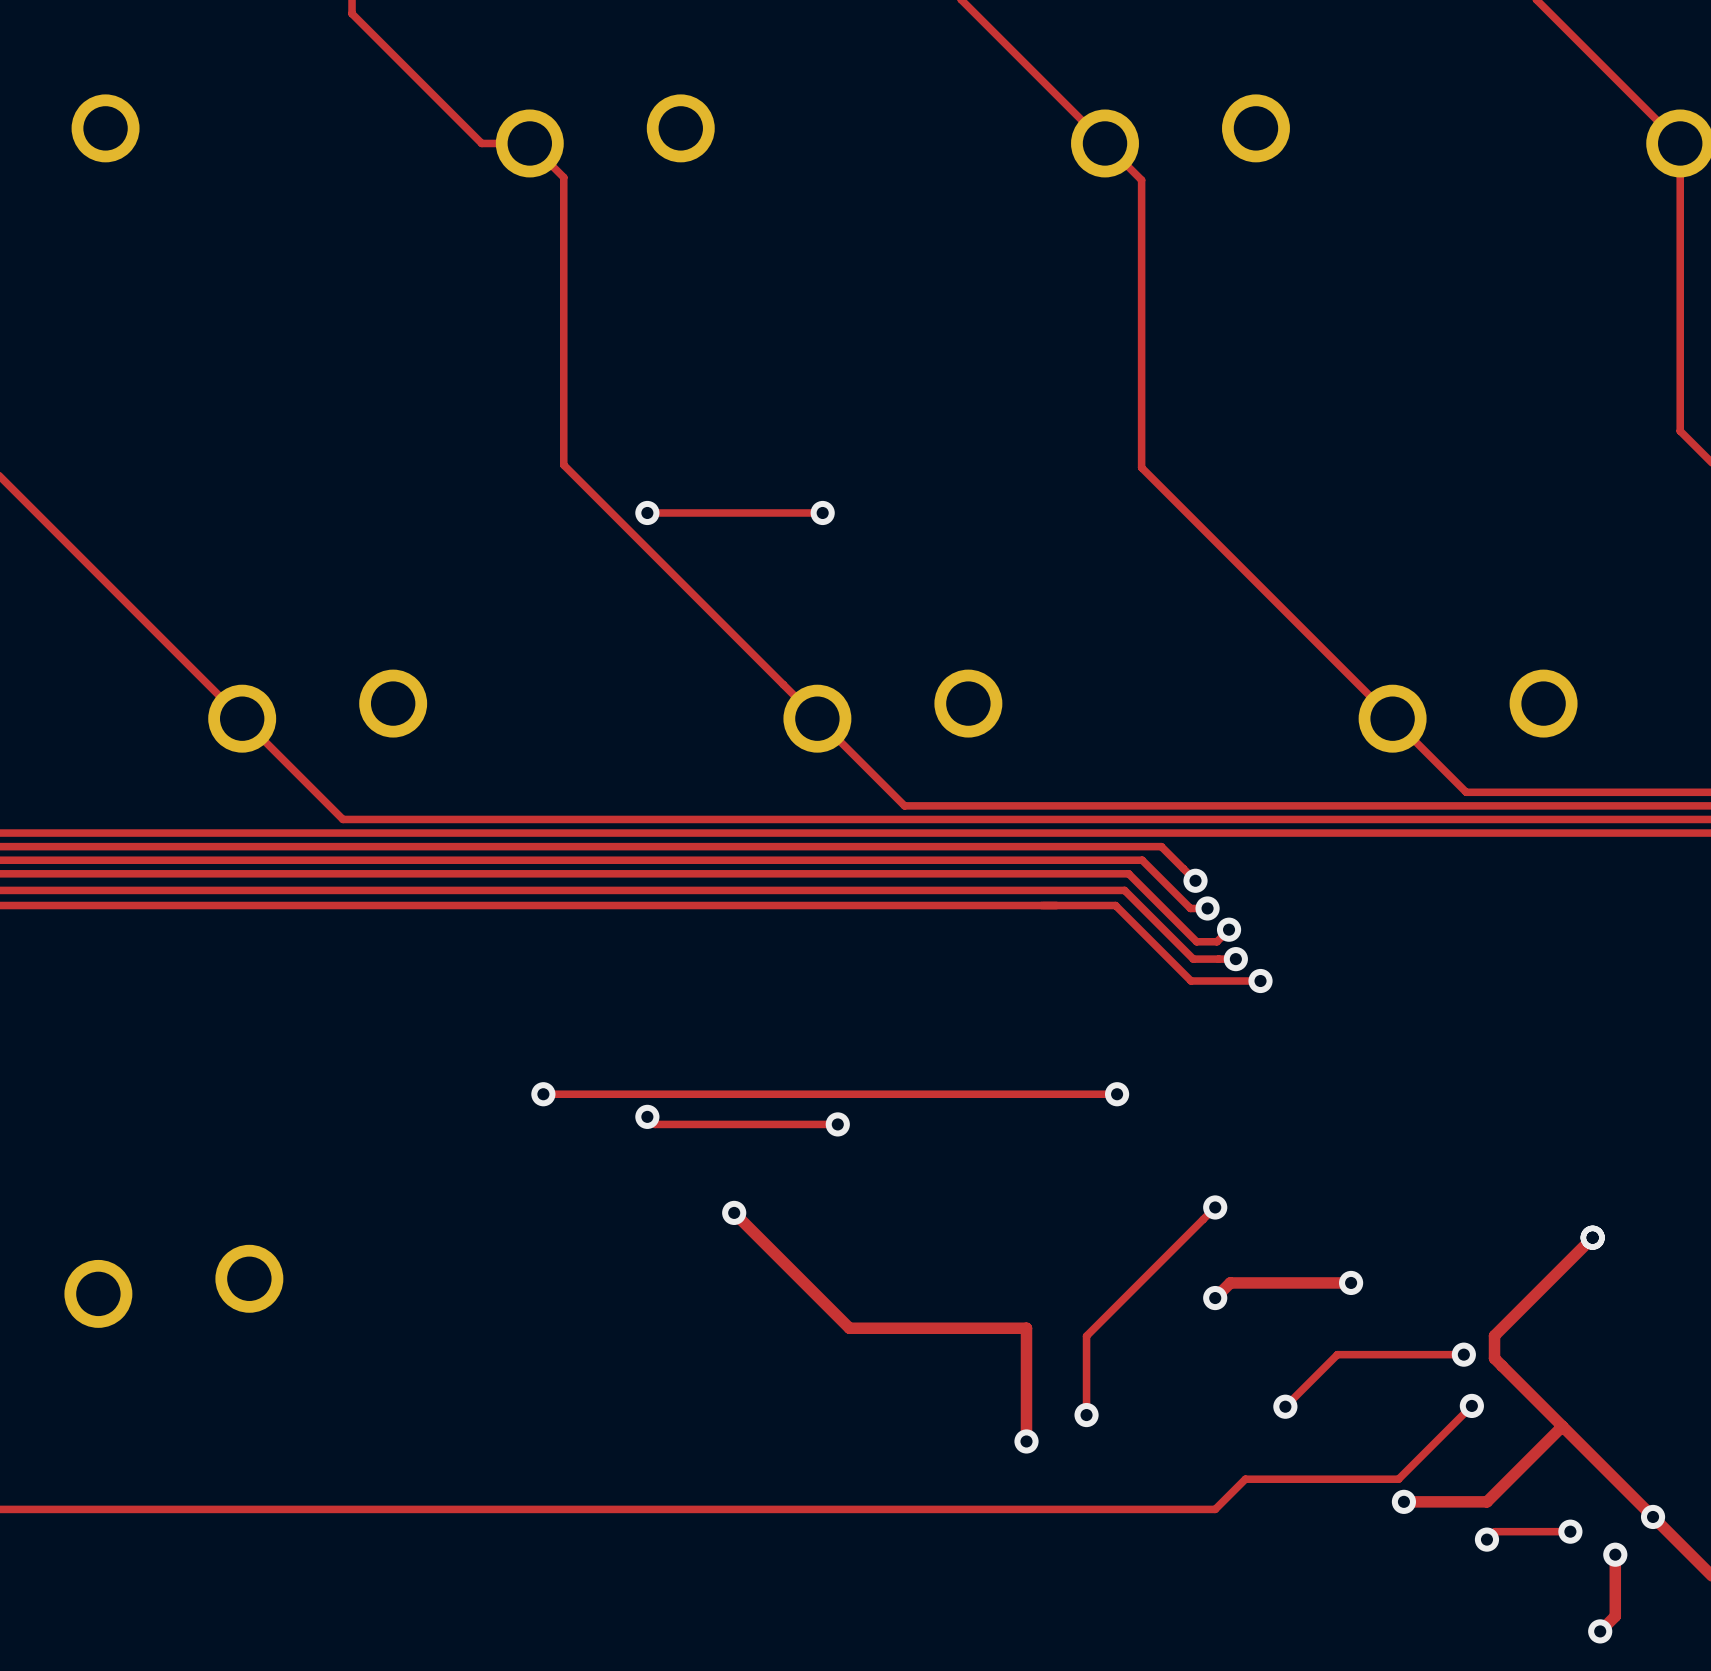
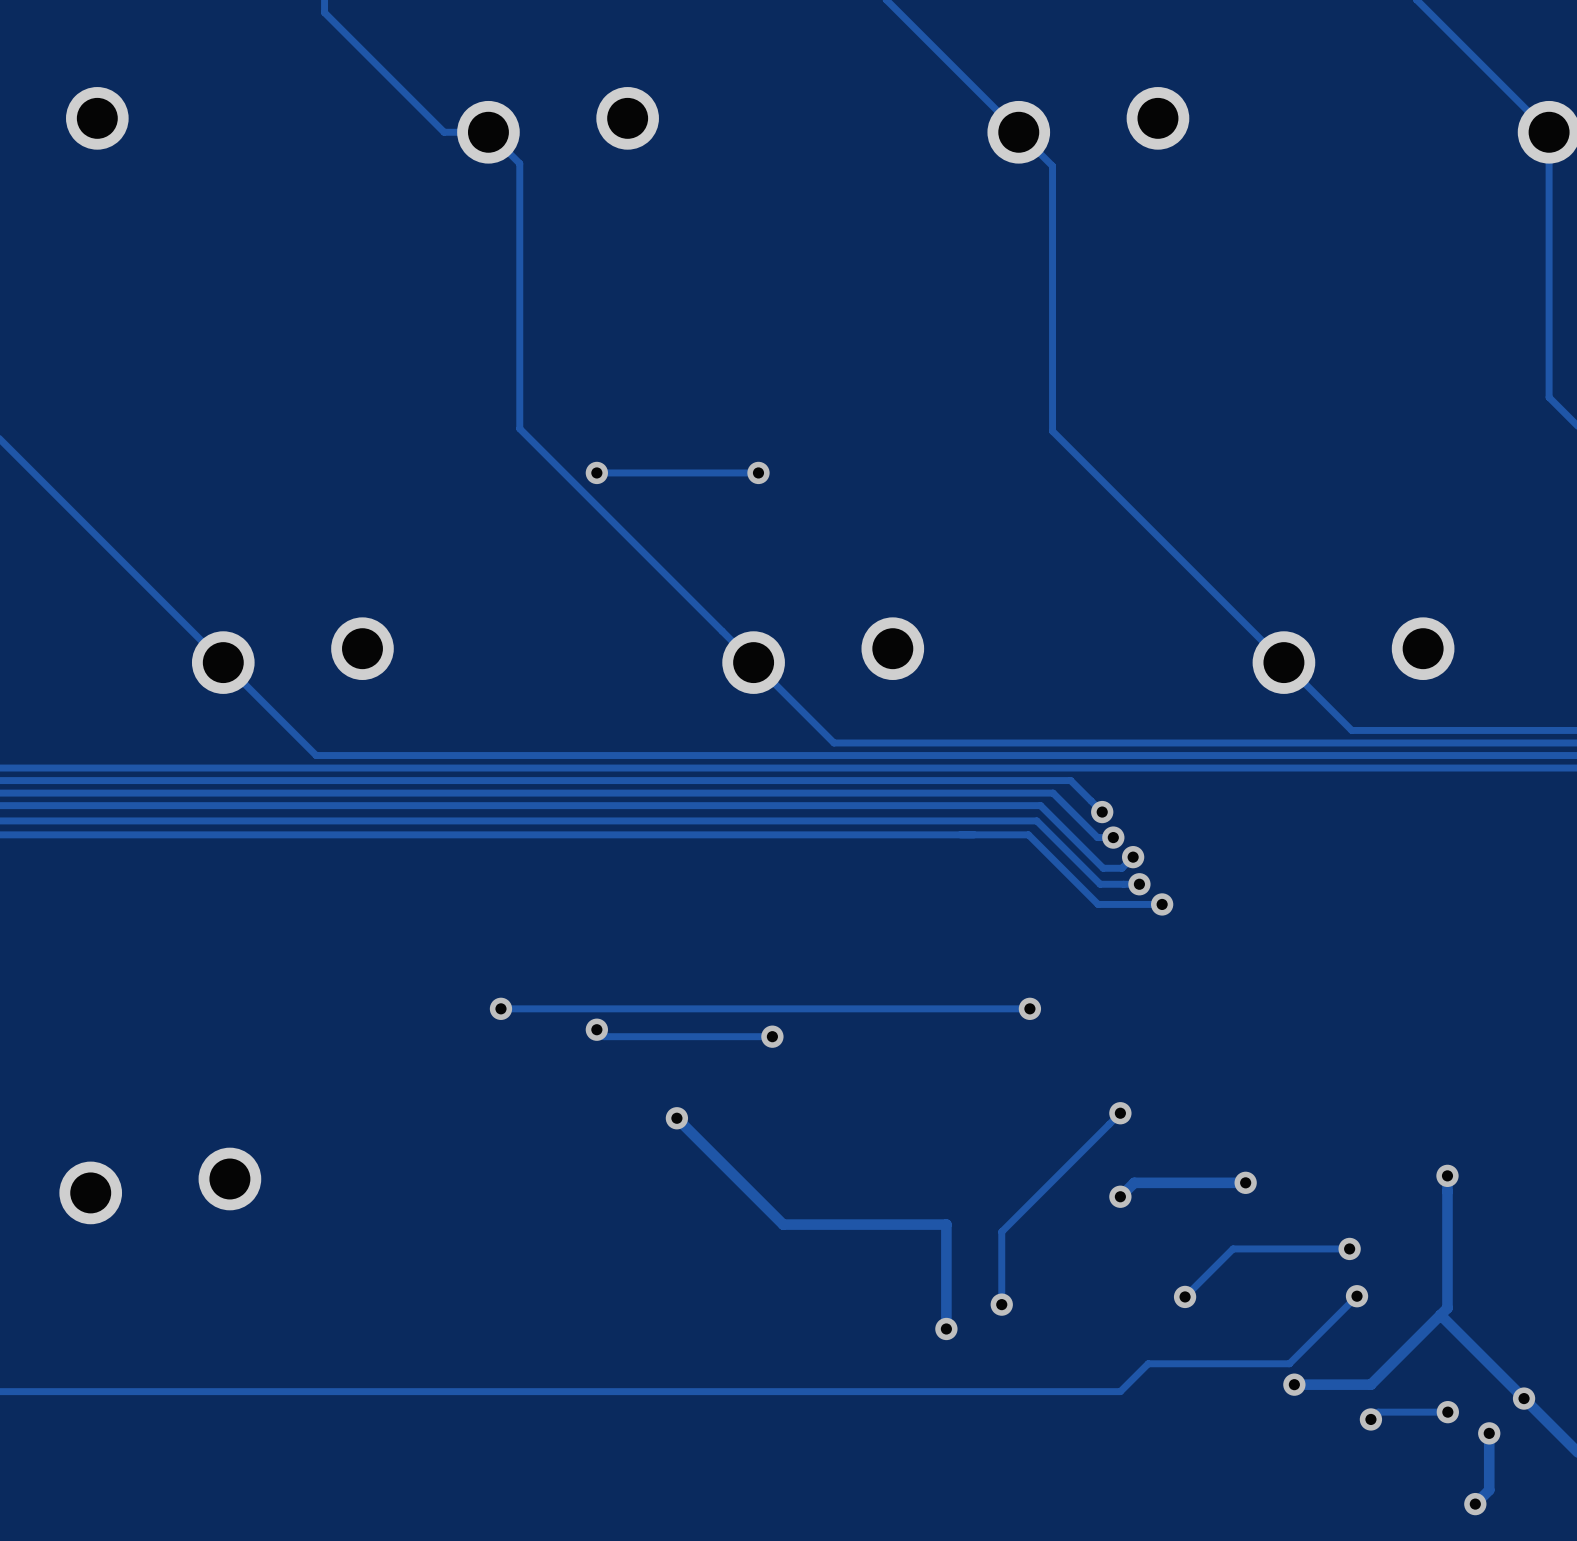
track: (1592, 1237) (1494, 1335) (1494, 1358) (1562, 1426) -> (1447, 1175) (1447, 1308) (1440, 1315)
via position: (1592, 1237) -> (1447, 1175)

